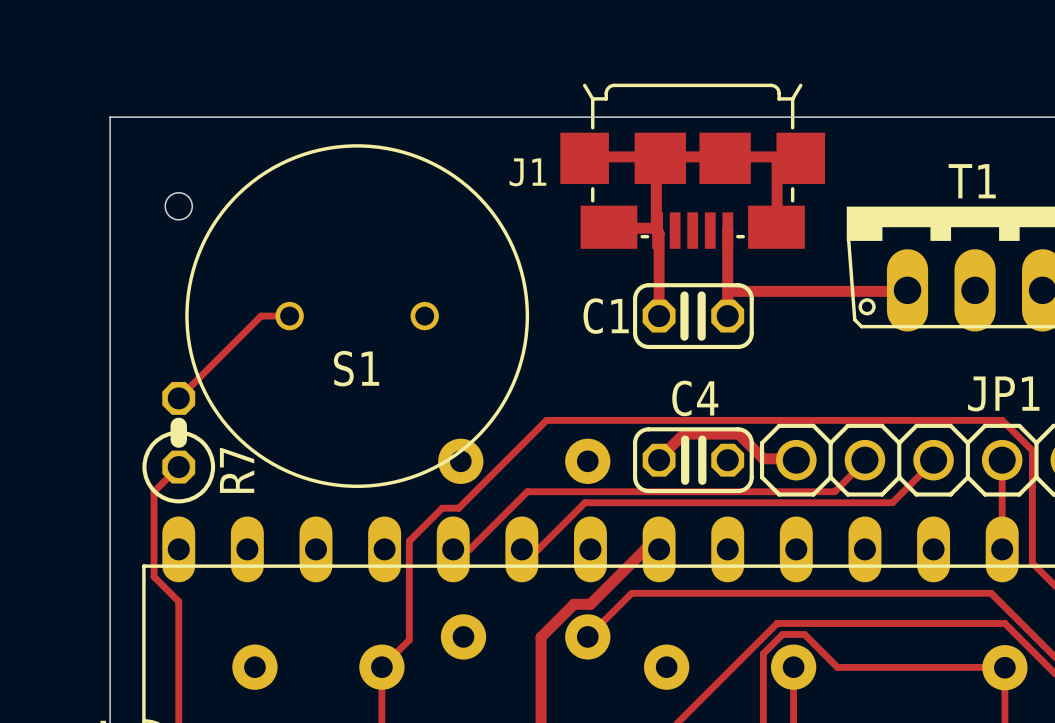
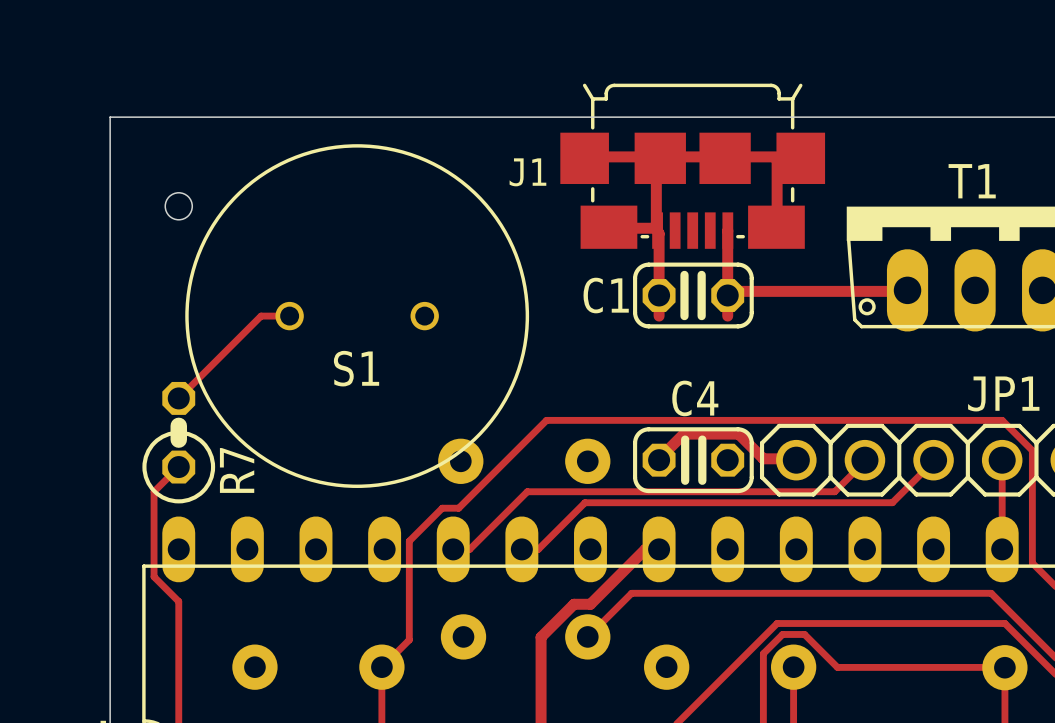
C1 position: (693, 316) -> (693, 295)

